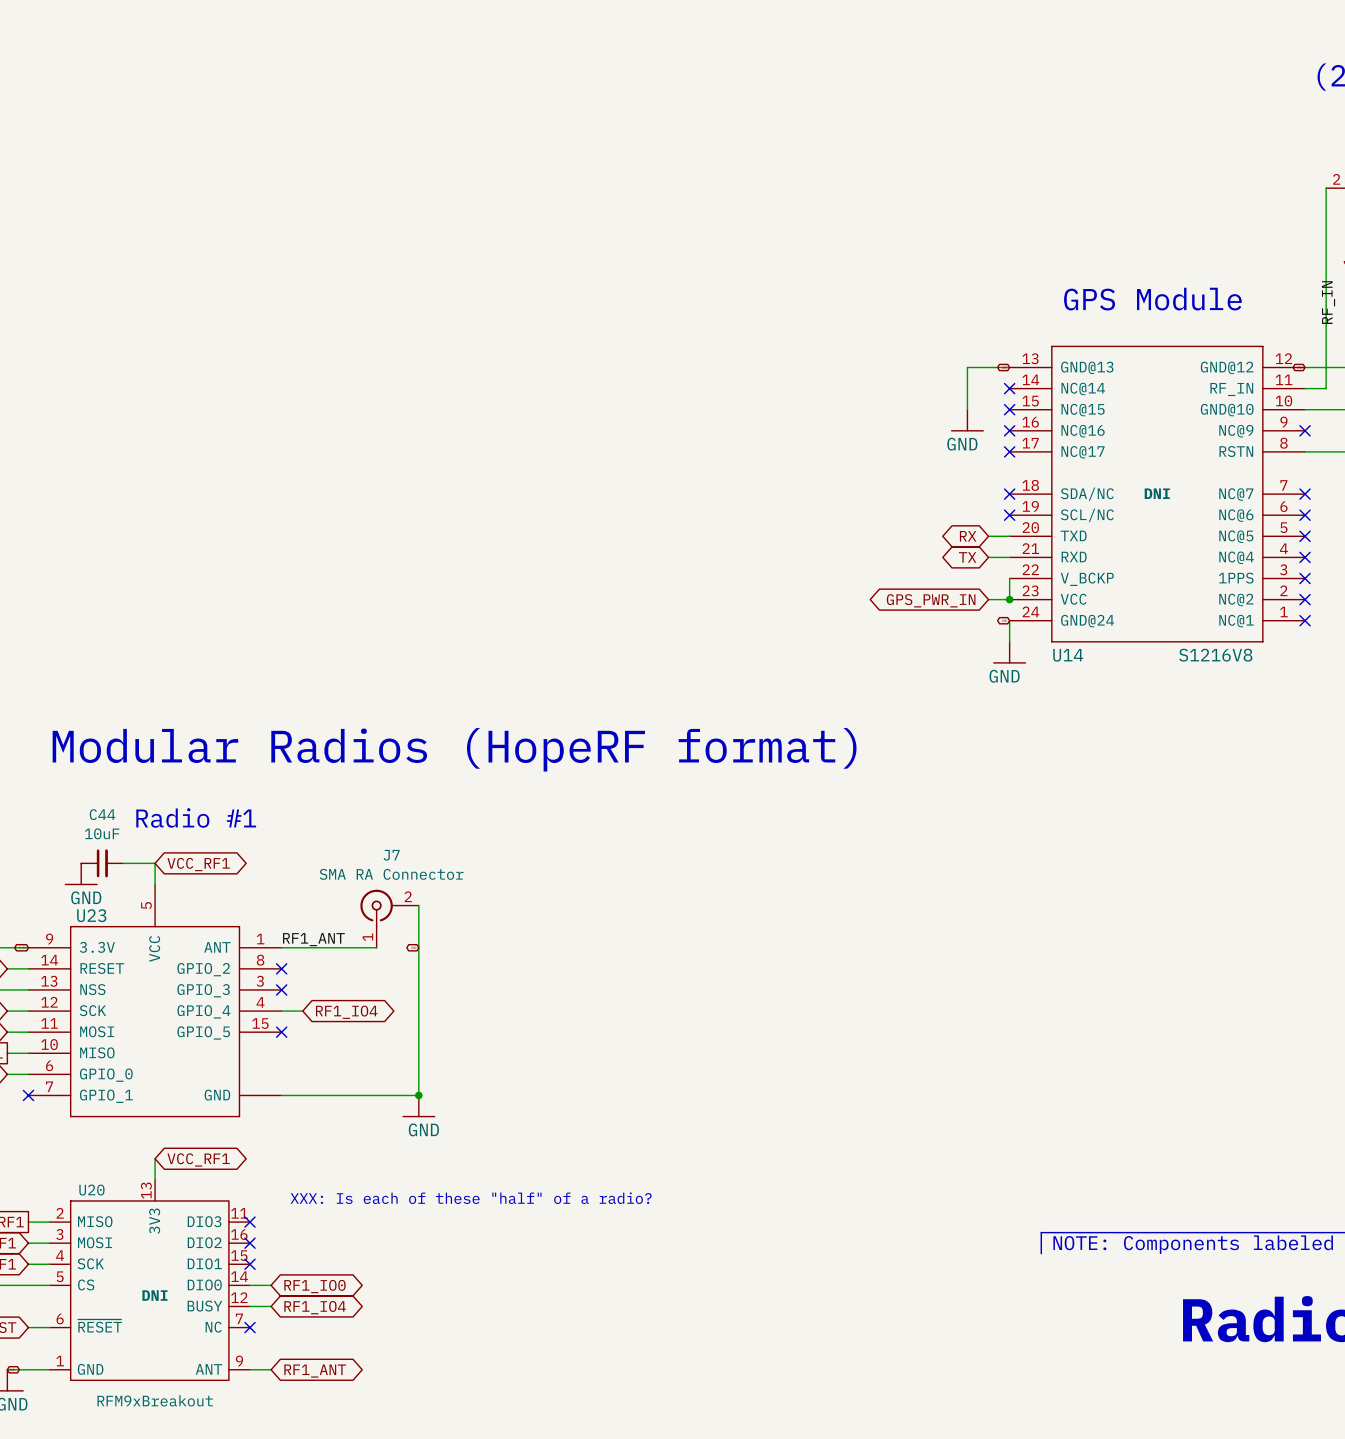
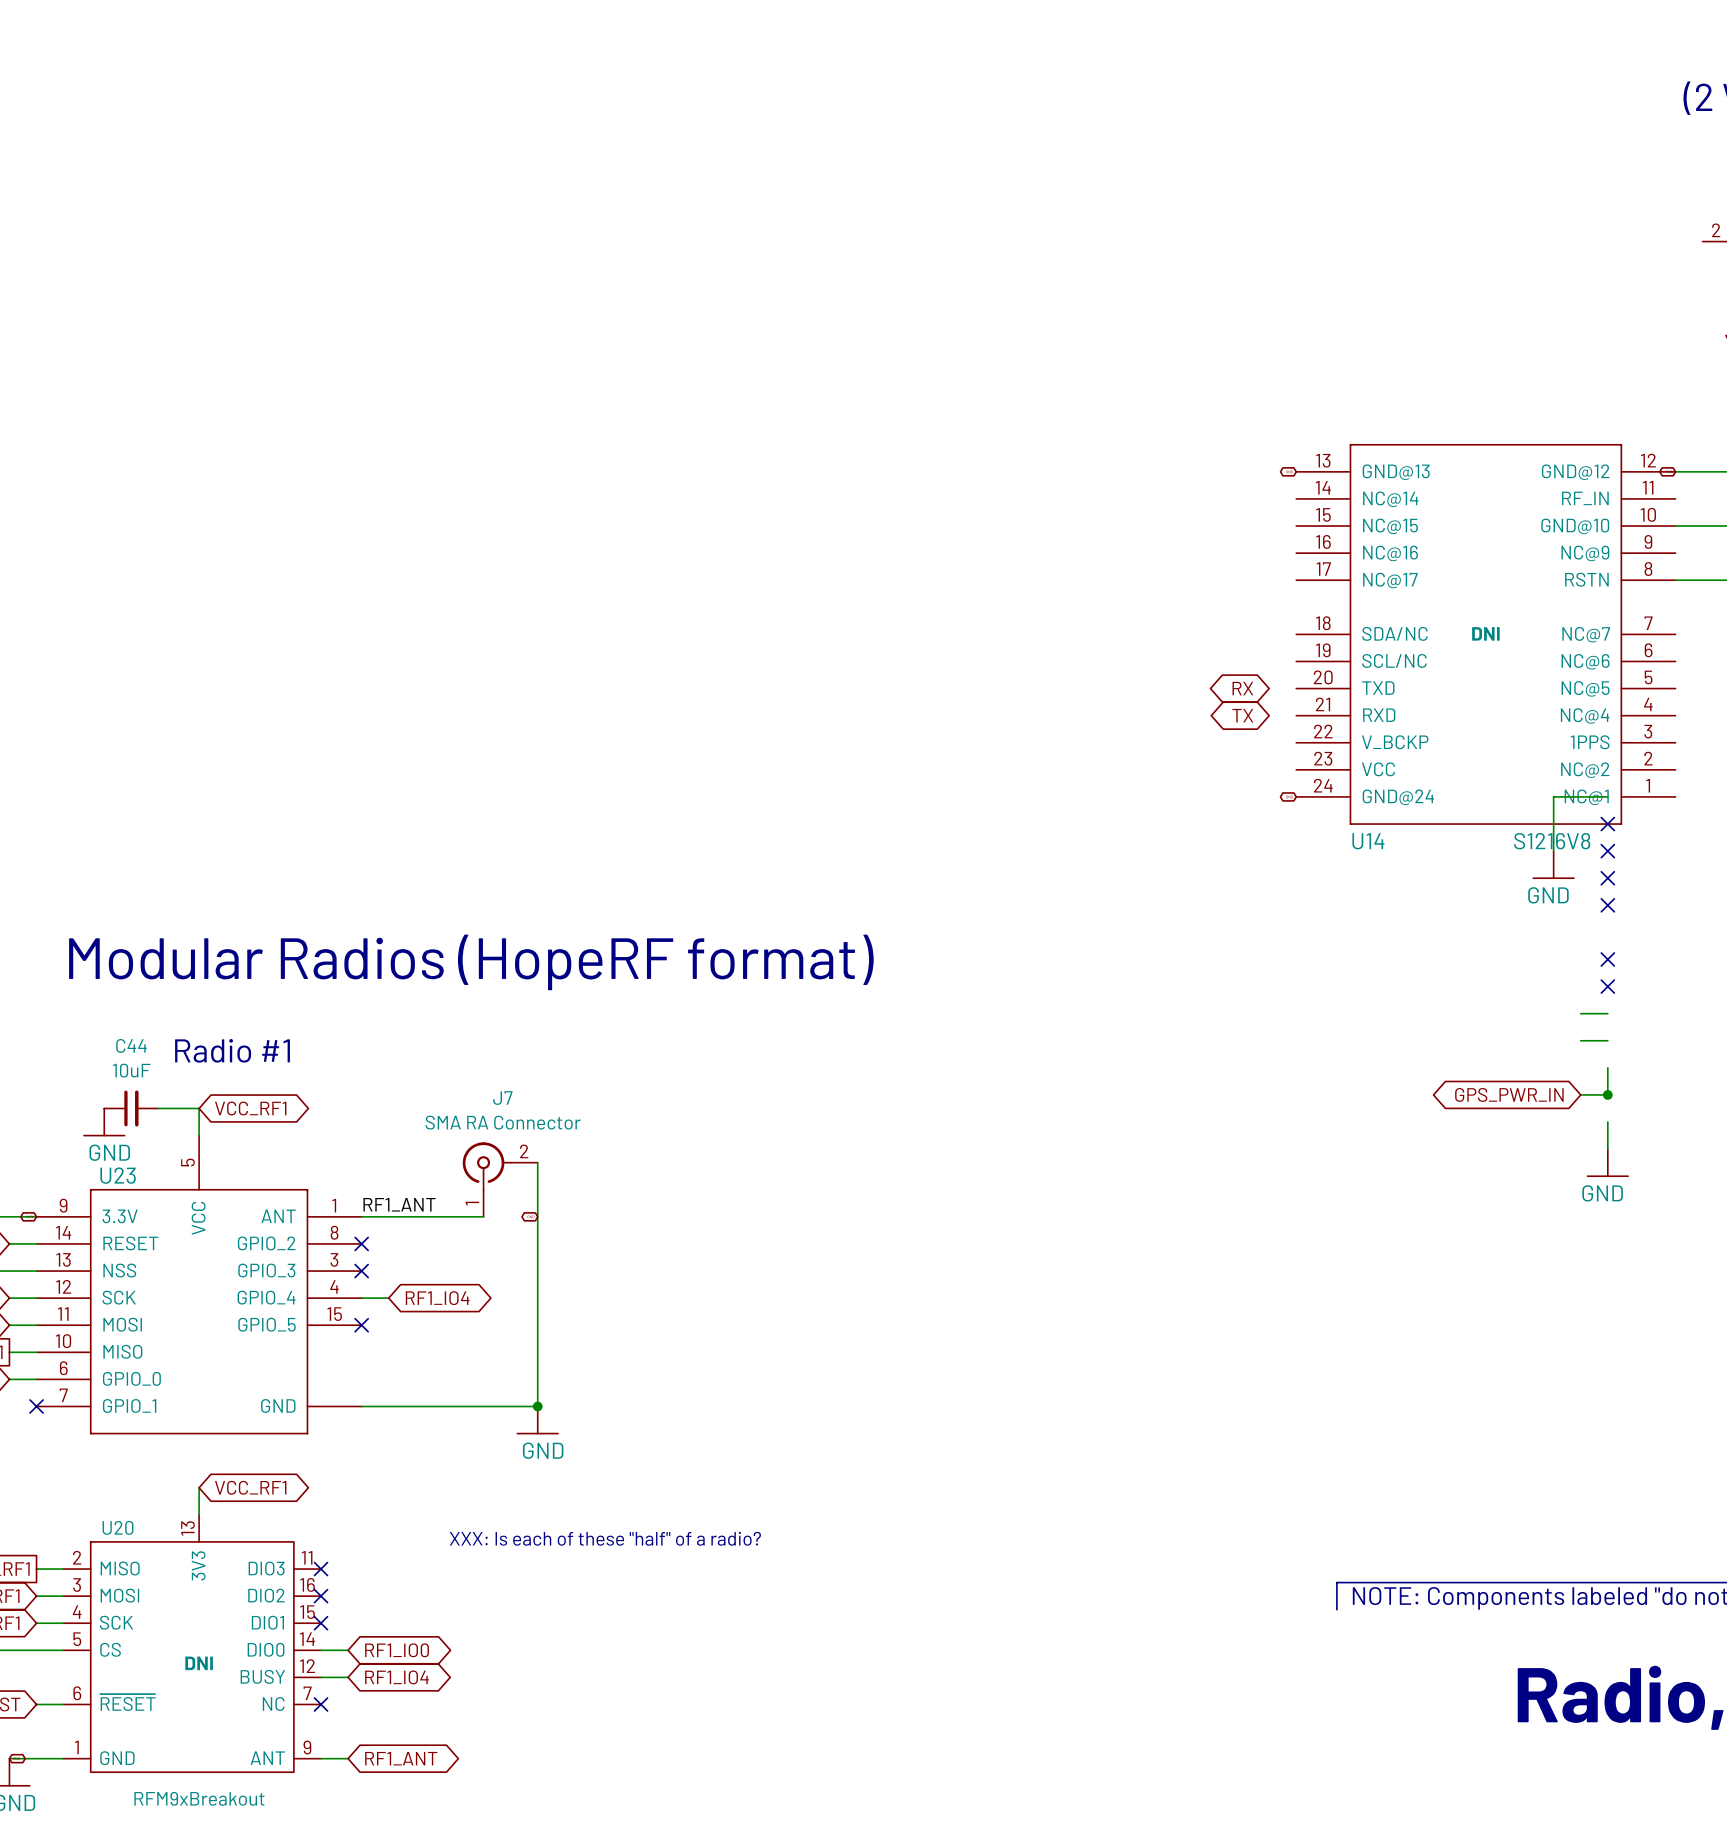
wire: (1326, 188) (1326, 388) (1305, 388) -> none
text: GPS Module (1152, 299) -> none
label: RF_IN (1328, 302) -> none
wire: (1009, 367) (967, 367) (967, 409) -> none
no-connect mark: (1009, 388) -> none
no-connect mark: (1009, 409) -> none
power symbol: GND (967, 420) -> none
no-connect mark: (1009, 430) -> none
no-connect mark: (1305, 430) -> none
no-connect mark: (1009, 451) -> none
no-connect mark: (1009, 494) -> none
no-connect mark: (1305, 494) -> none
no-connect mark: (1009, 515) -> none
no-connect mark: (1305, 515) -> none
wire: (988, 536) (1009, 536) -> none
no-connect mark: (1305, 536) -> none
wire: (988, 557) (1009, 557) -> none
no-connect mark: (1305, 557) -> none
wire: (1009, 578) (1009, 599) (988, 599) -> none
no-connect mark: (1305, 578) -> none
junction: (1009, 599) -> none
no-connect mark: (1305, 599) -> none
global label: GPS_PWR_IN (931, 600) -> none
wire: (1009, 620) (1009, 641) -> none
wire: none -> (1607, 796) (1553, 796) (1553, 851)
no-connect mark: (1305, 620) -> none
no-connect mark: none -> (1607, 824)
power symbol: GND (1009, 652) -> none
no-connect mark: none -> (1607, 851)
power symbol: none -> GND (1553, 864)
no-connect mark: none -> (1607, 878)
no-connect mark: none -> (1607, 905)
no-connect mark: none -> (1607, 959)
no-connect mark: none -> (1607, 986)
wire: none -> (1580, 1013) (1607, 1013)
wire: none -> (1580, 1040) (1607, 1040)
wire: none -> (1607, 1067) (1607, 1094) (1580, 1094)
junction: none -> (1607, 1094)
global label: none -> GPS_PWR_IN (1509, 1094)
wire: none -> (1607, 1122) (1607, 1149)
power symbol: none -> GND (1607, 1162)

